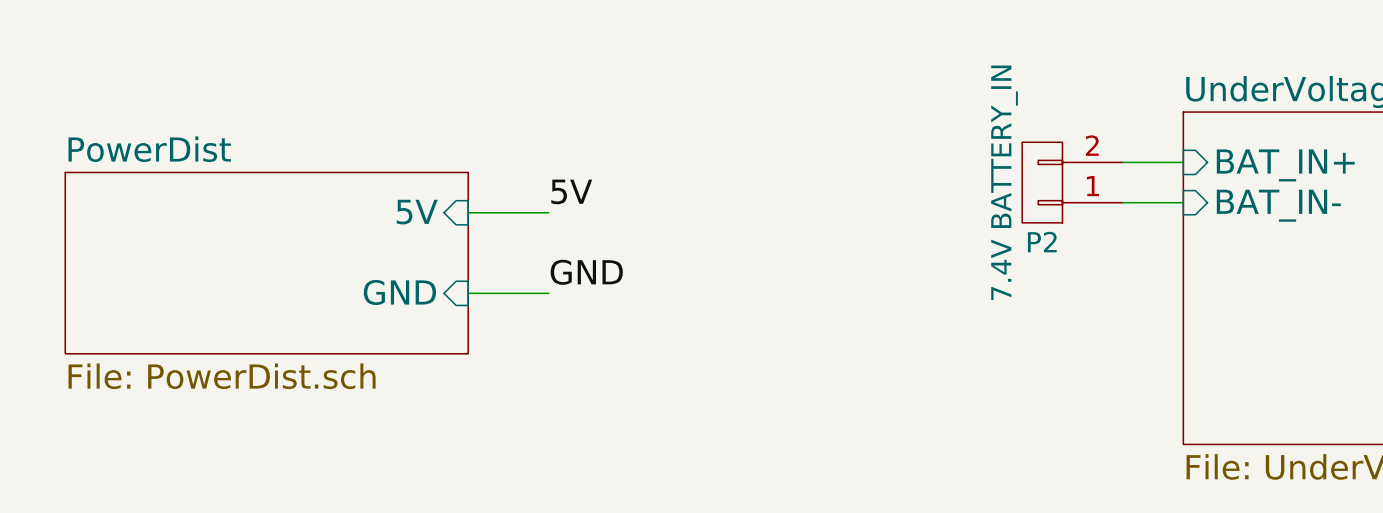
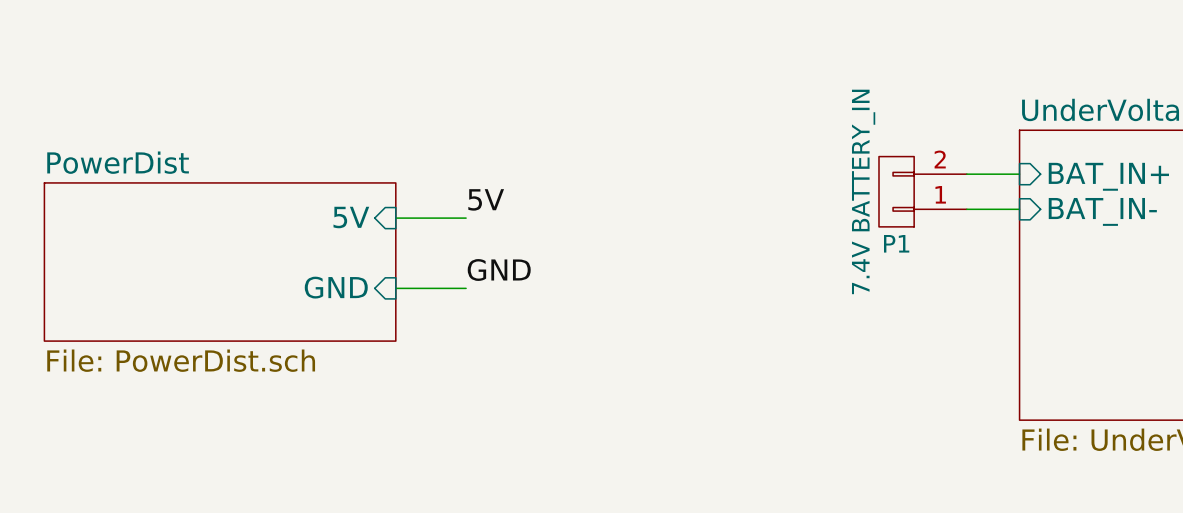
P2 name: P2 (1042, 242) -> P1 (896, 243)

